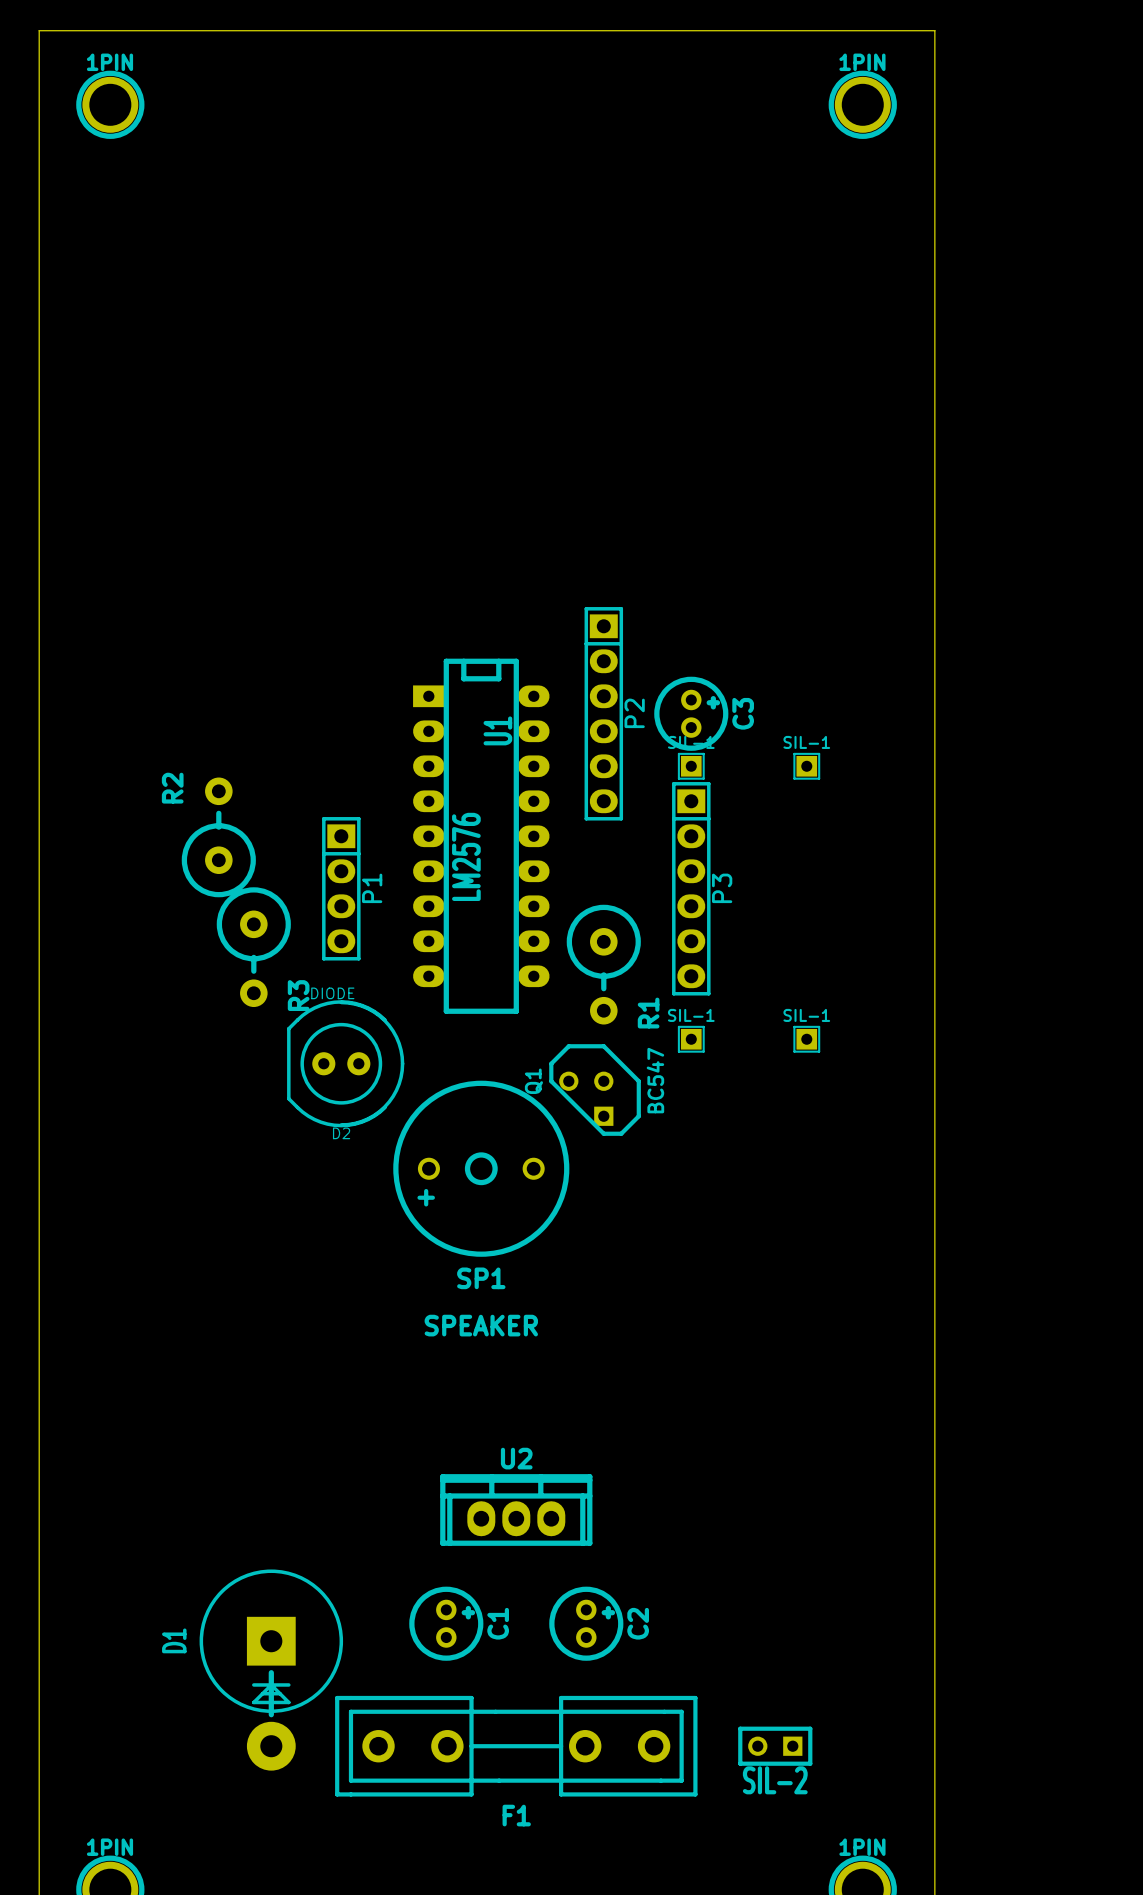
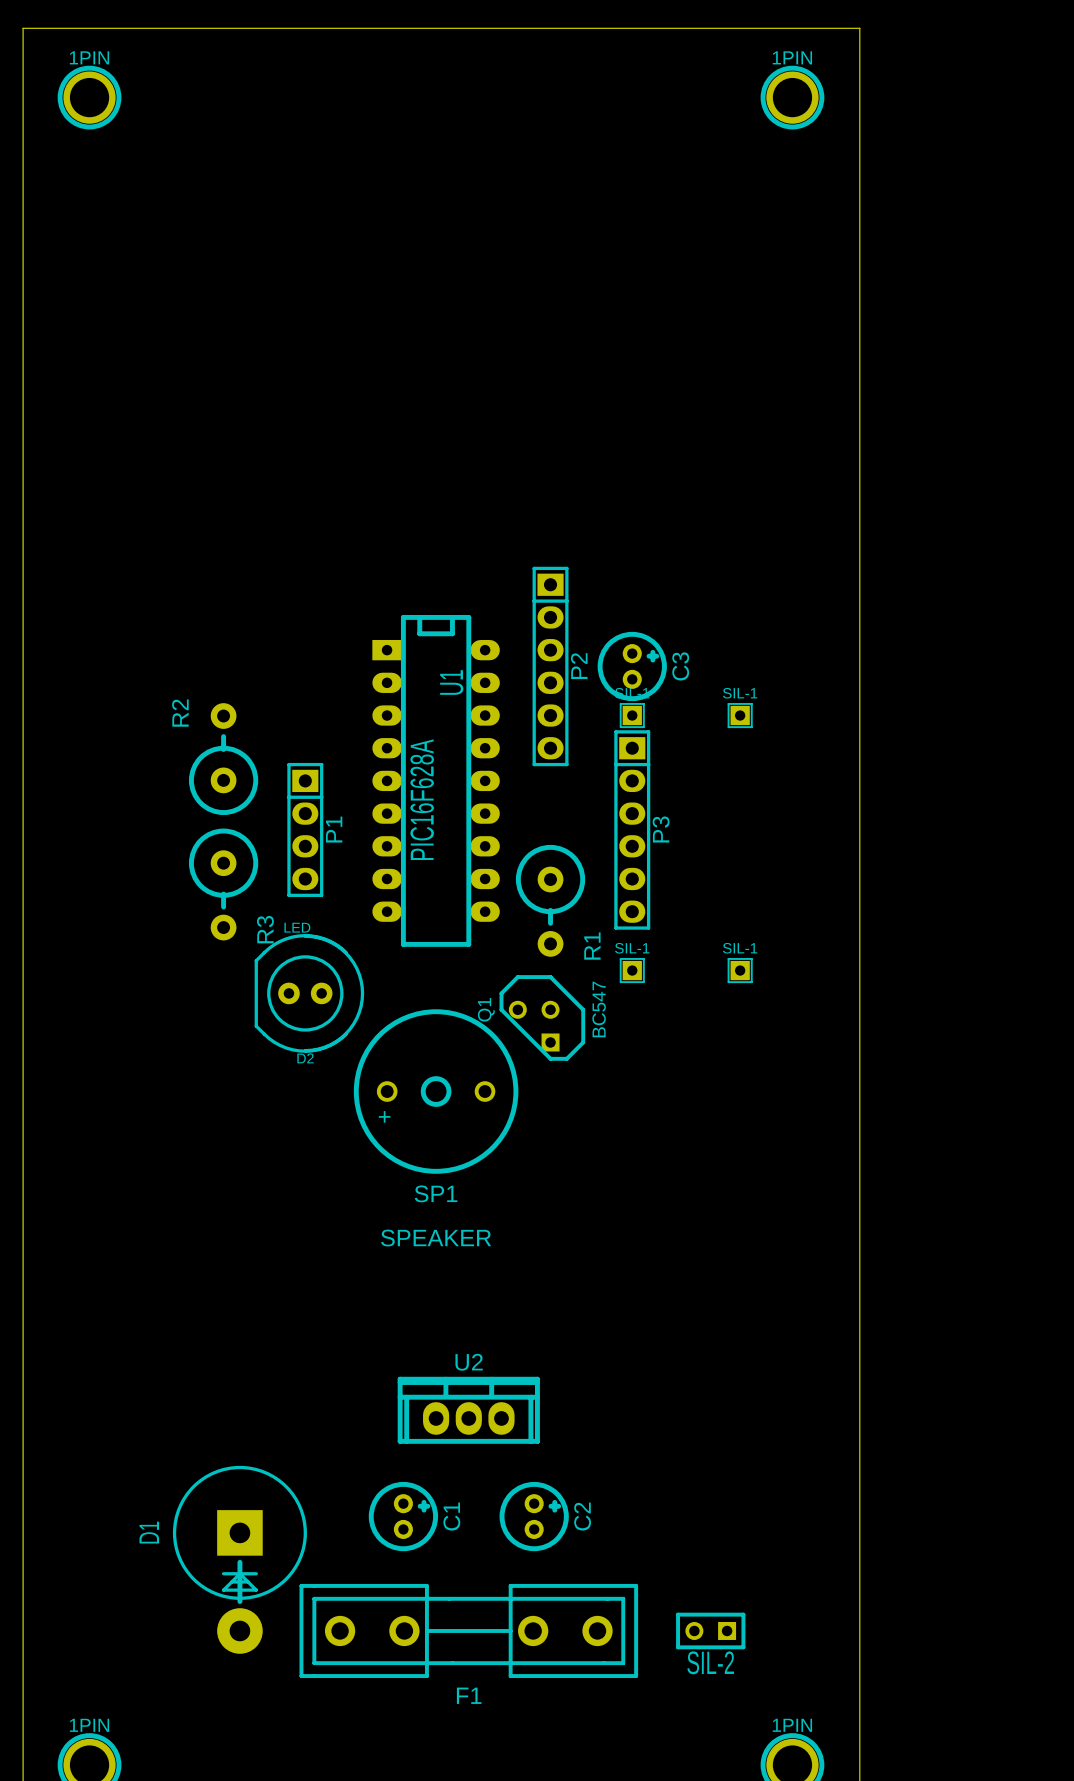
R2 position: (218, 837) -> (223, 759)
U1 value: LM2576 (466, 856) -> PIC16F628A (422, 799)
D2 value: DIODE (332, 993) -> LED (297, 927)

